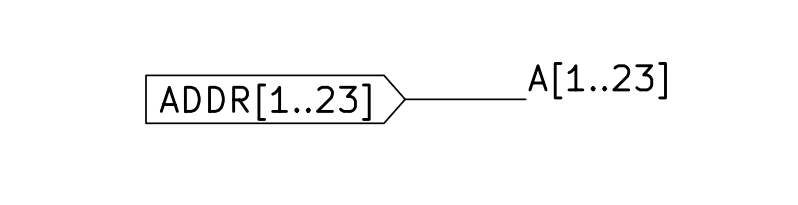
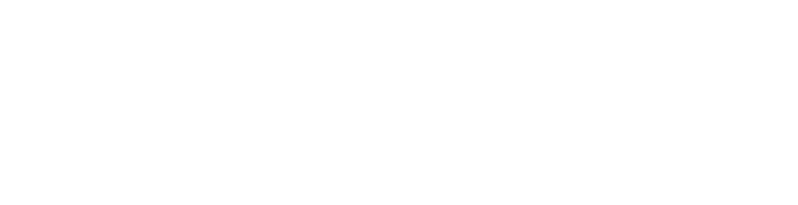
label: A[1..23] (597, 80) -> none
bus: (405, 99) (525, 99) -> none
global label: ADDR[1..23] (265, 102) -> none

